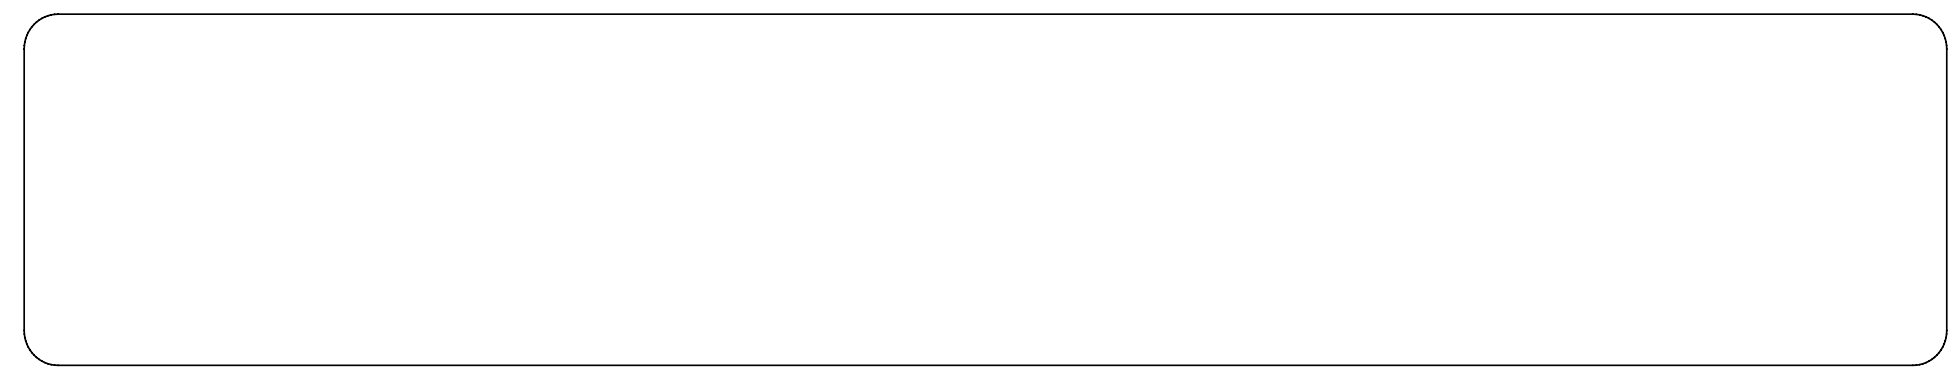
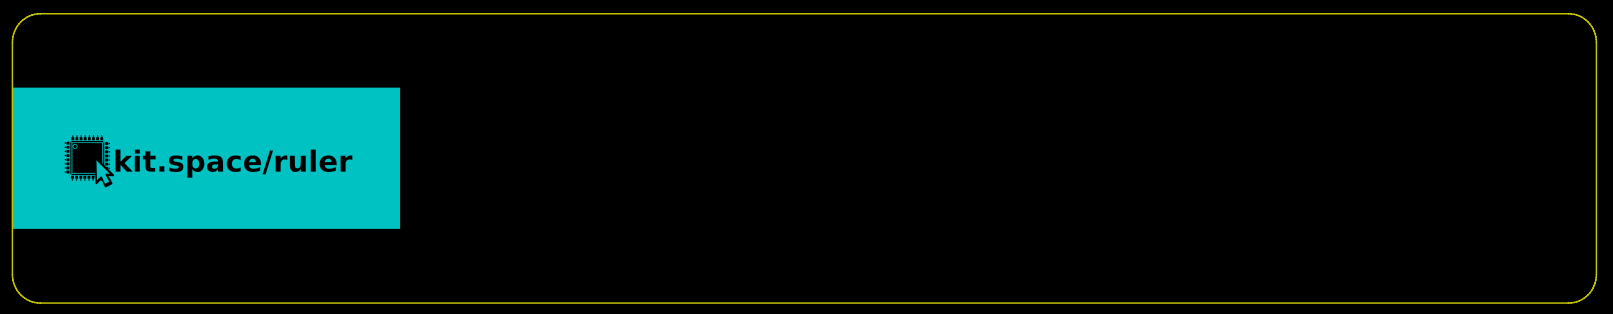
drawing: none -> [12, 87, 401, 229]

